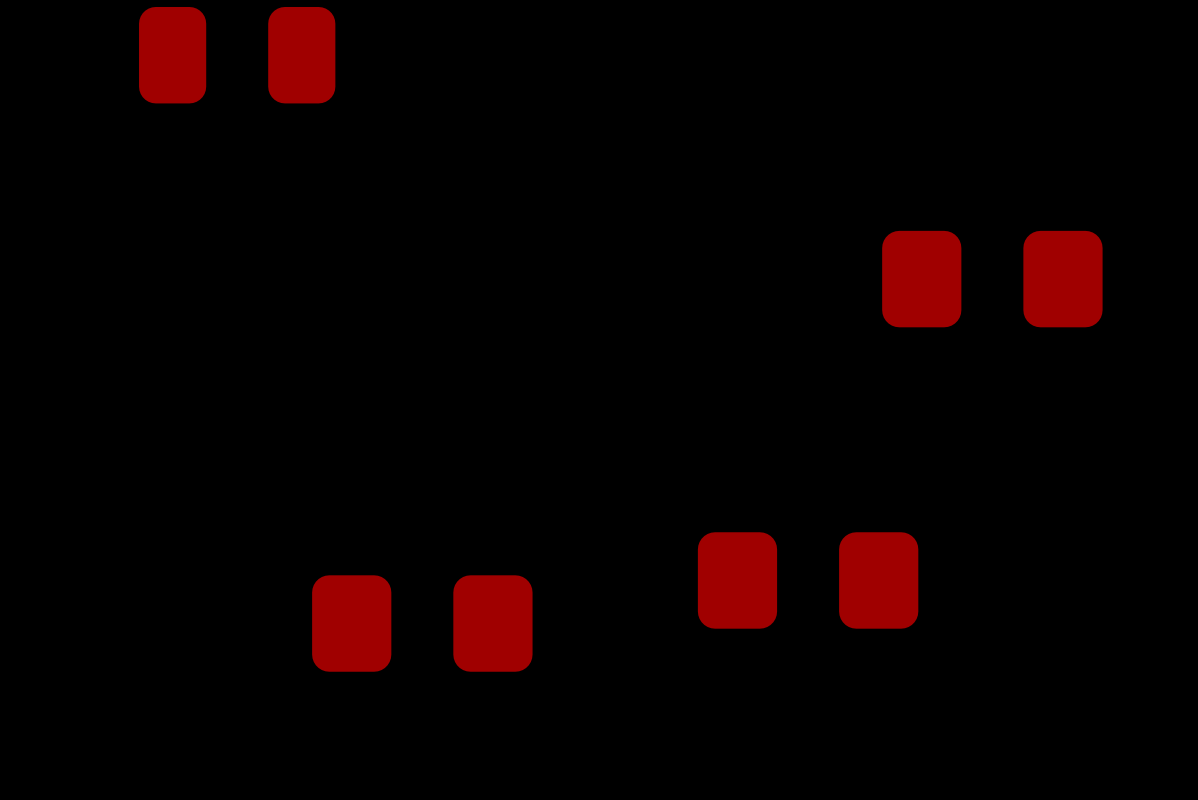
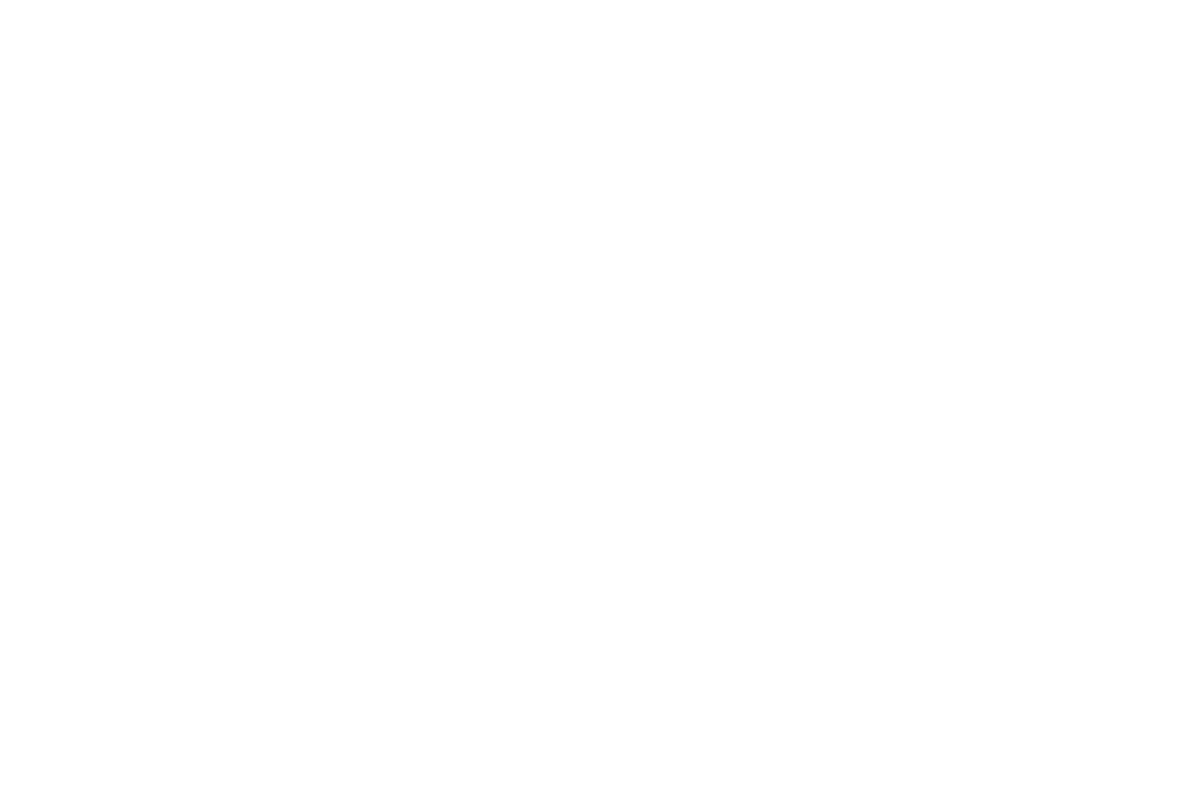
part: (237, 55) -> none
part: (992, 279) -> none
part: (808, 580) -> none
part: (422, 623) -> none

